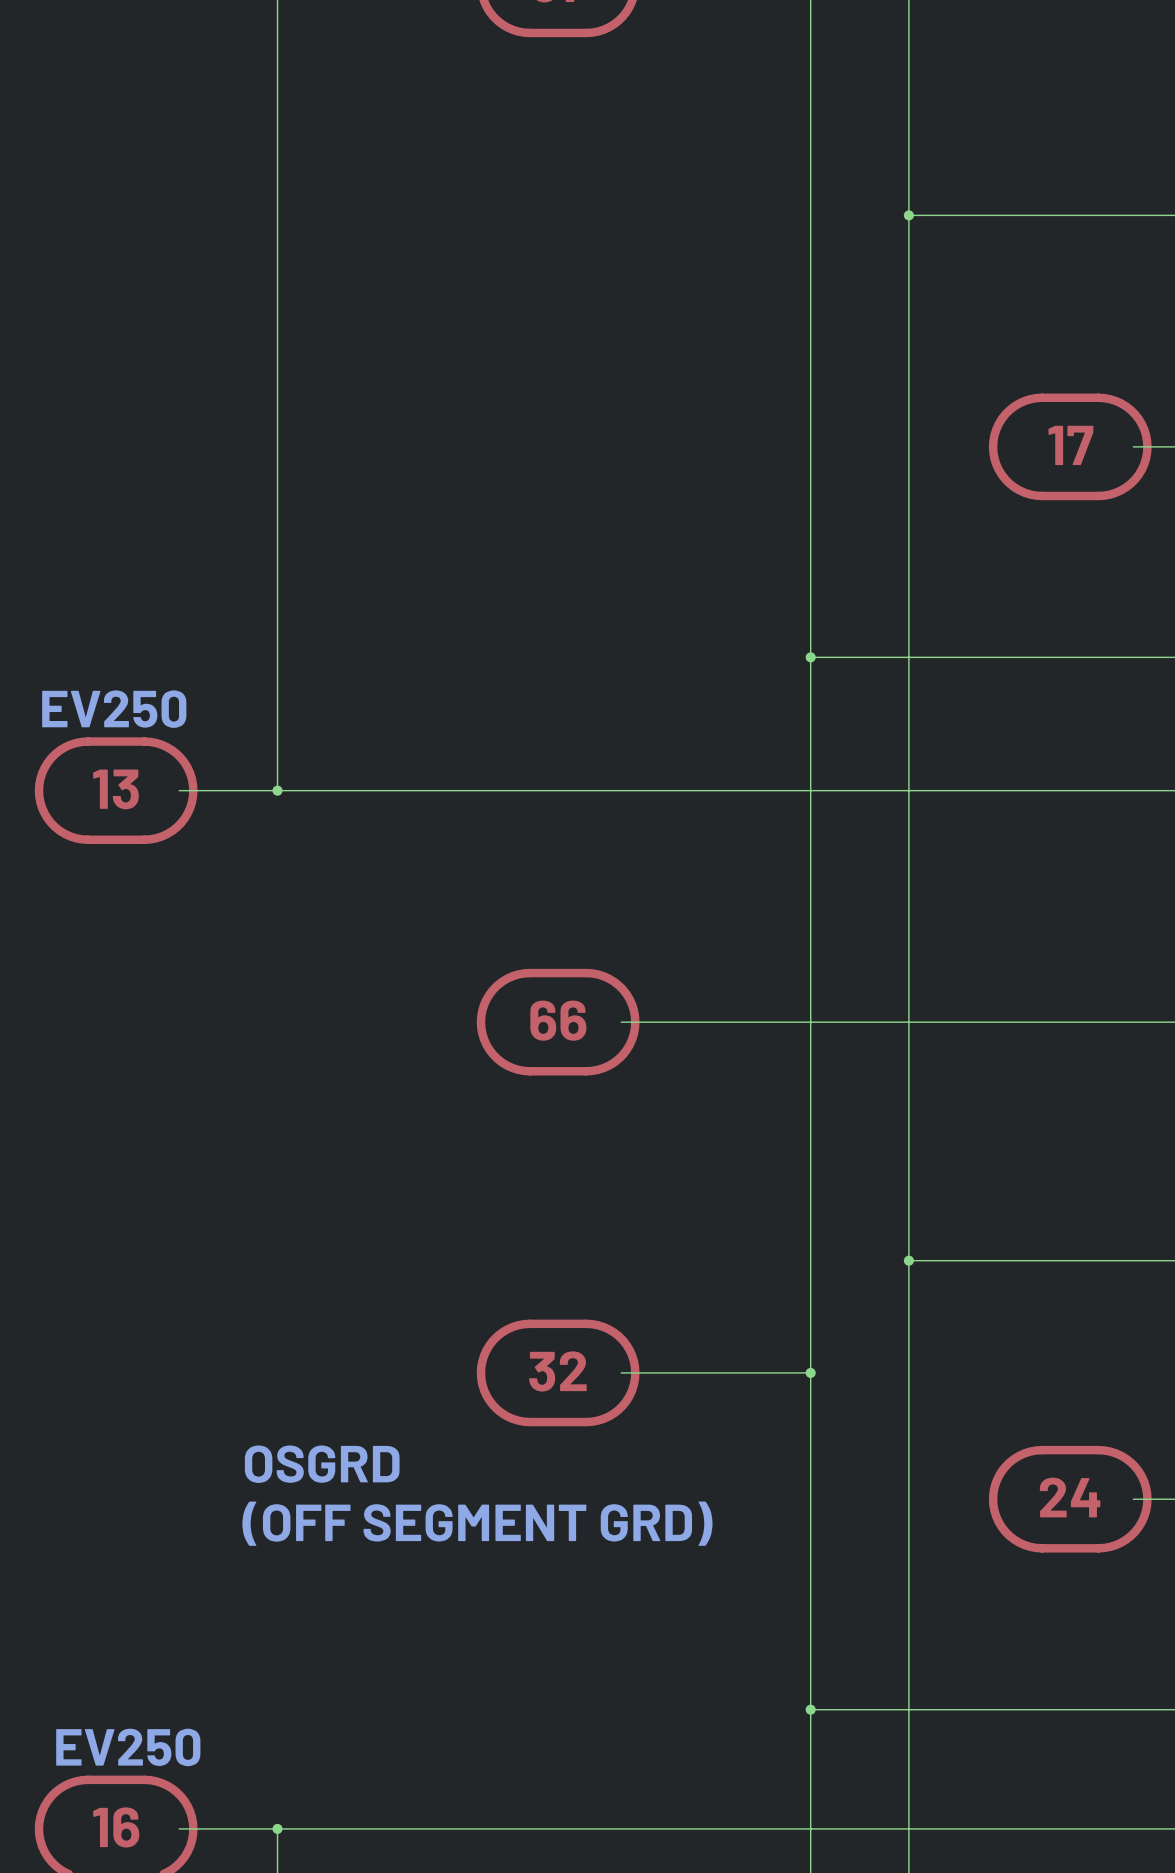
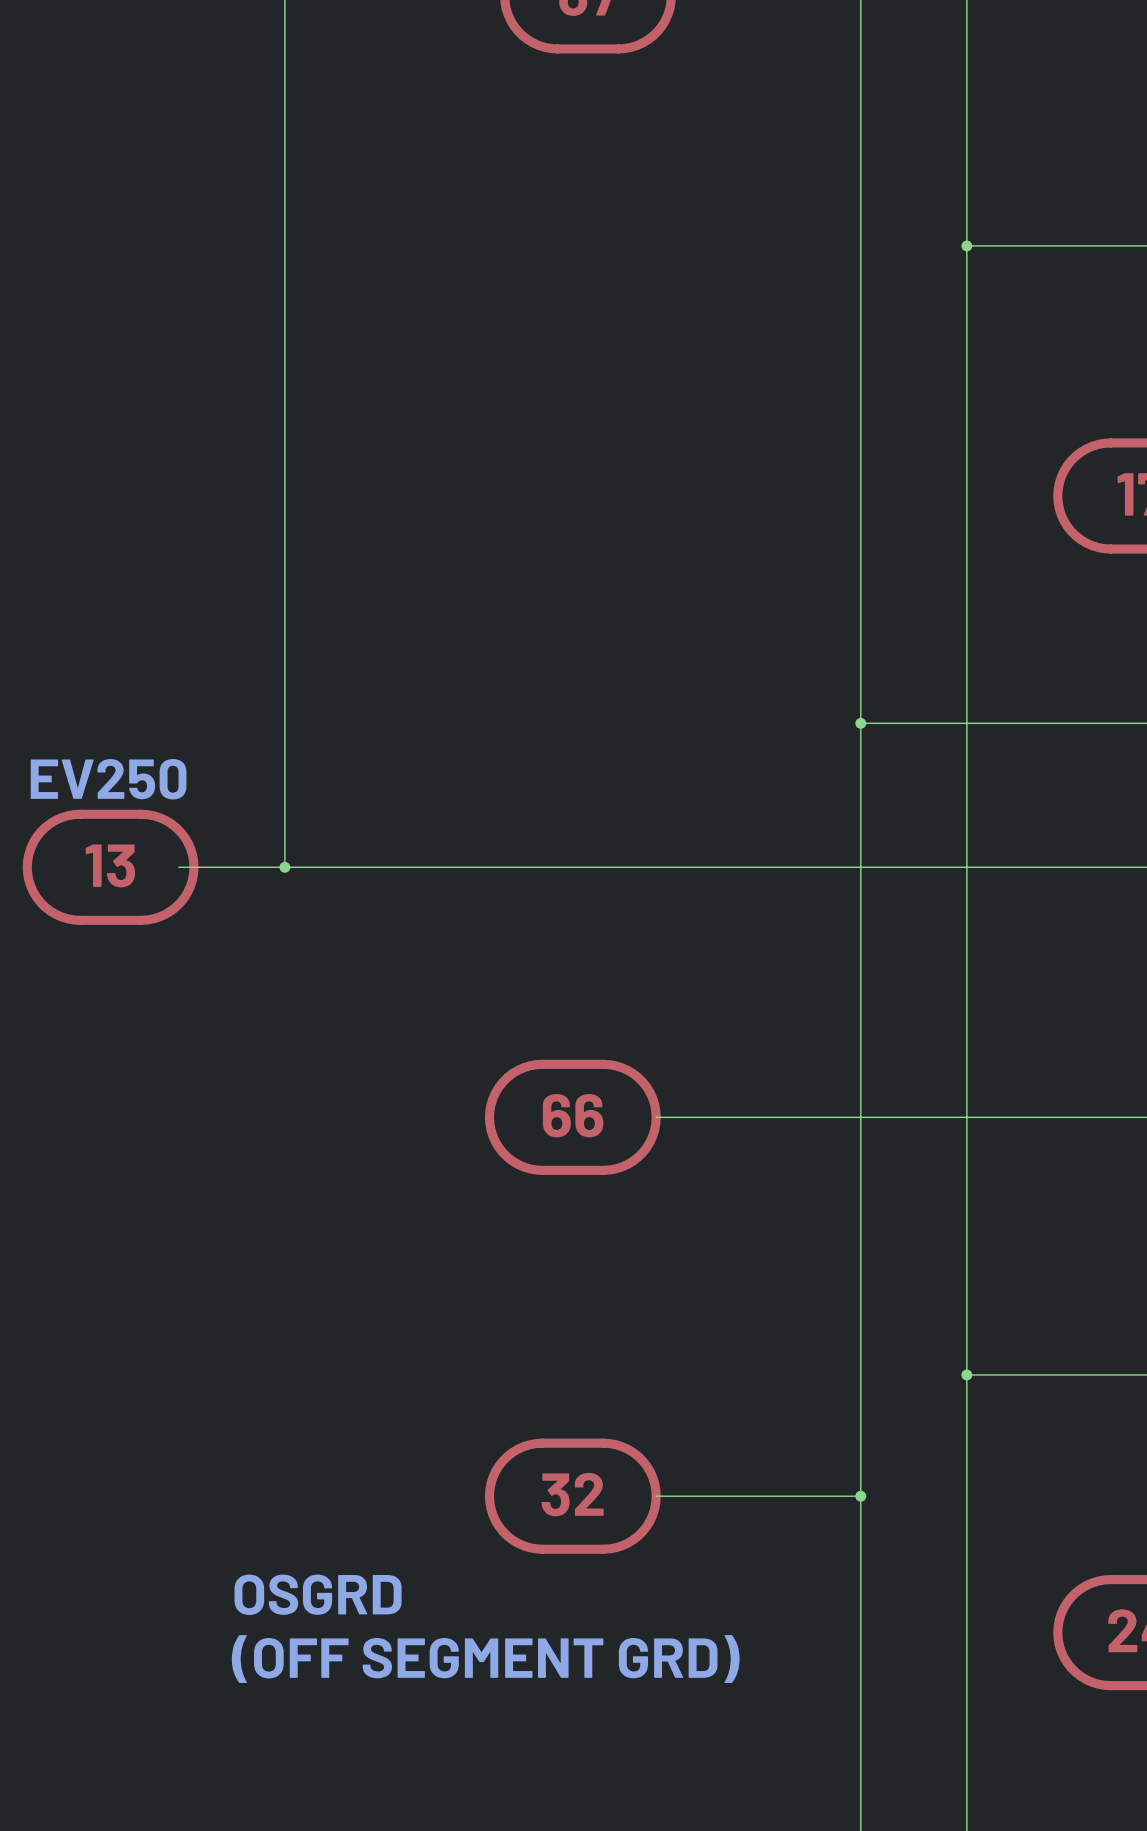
part position: (558, 1022) -> (572, 1117)
part position: (558, 1372) -> (572, 1496)
text position: OSGRD (322, 1464) -> OSGRD (318, 1594)
text position: (OFF SEGMENT GRD) (477, 1523) -> (OFF SEGMENT GRD) (485, 1659)

